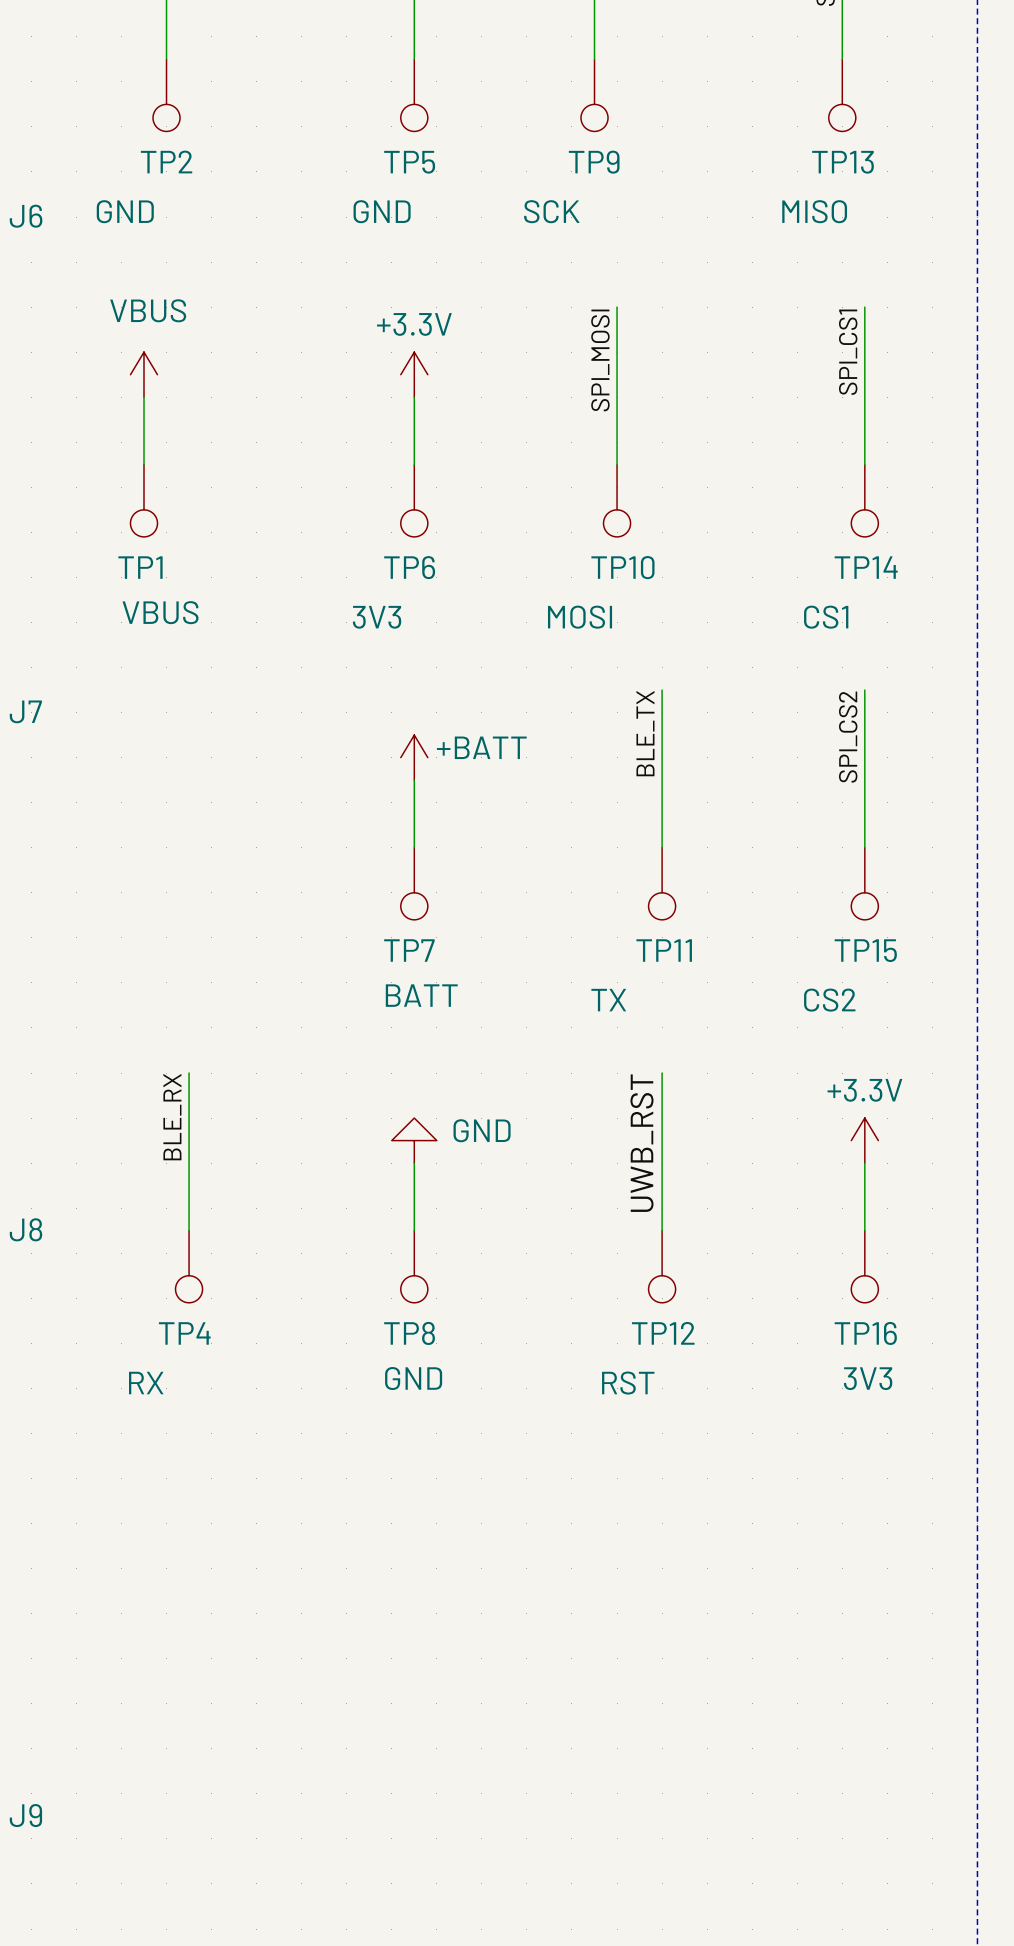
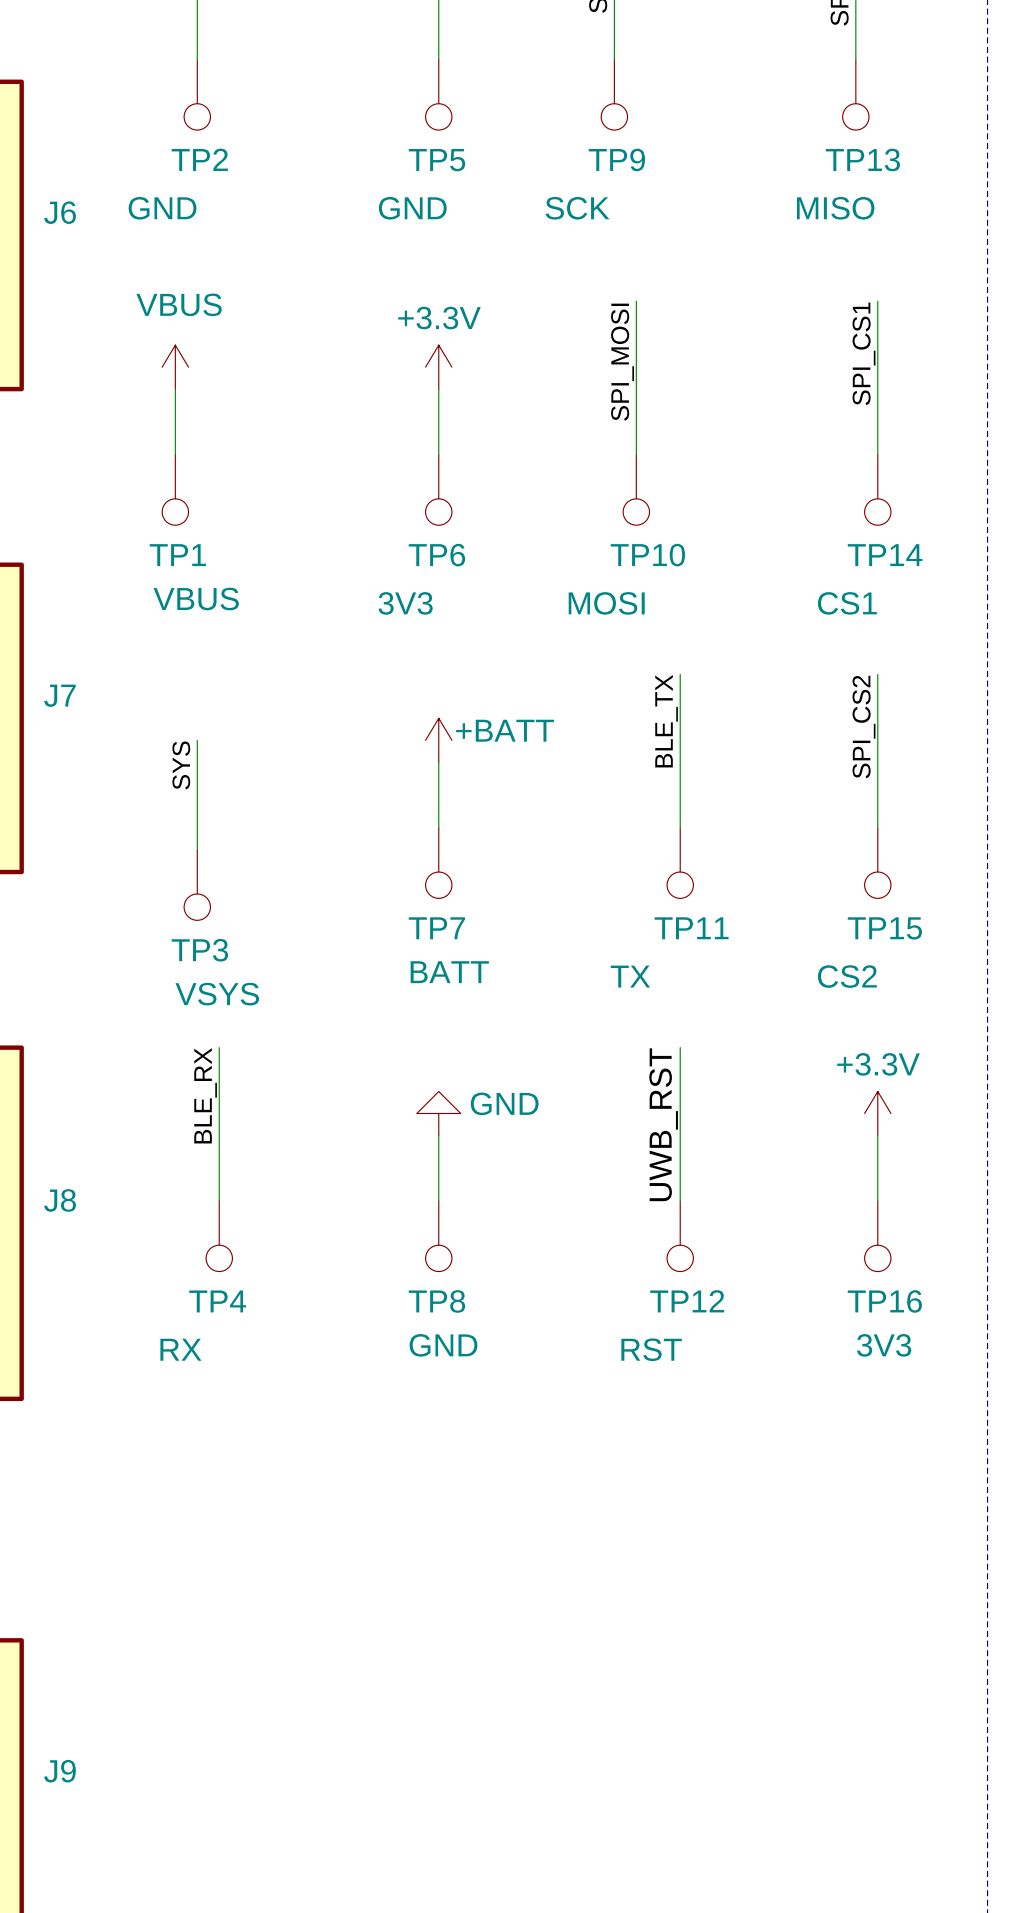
wire: none -> (197, 740) (197, 850)
label: none -> SYS (181, 765)
TP3: none -> VSYS (197, 885)

